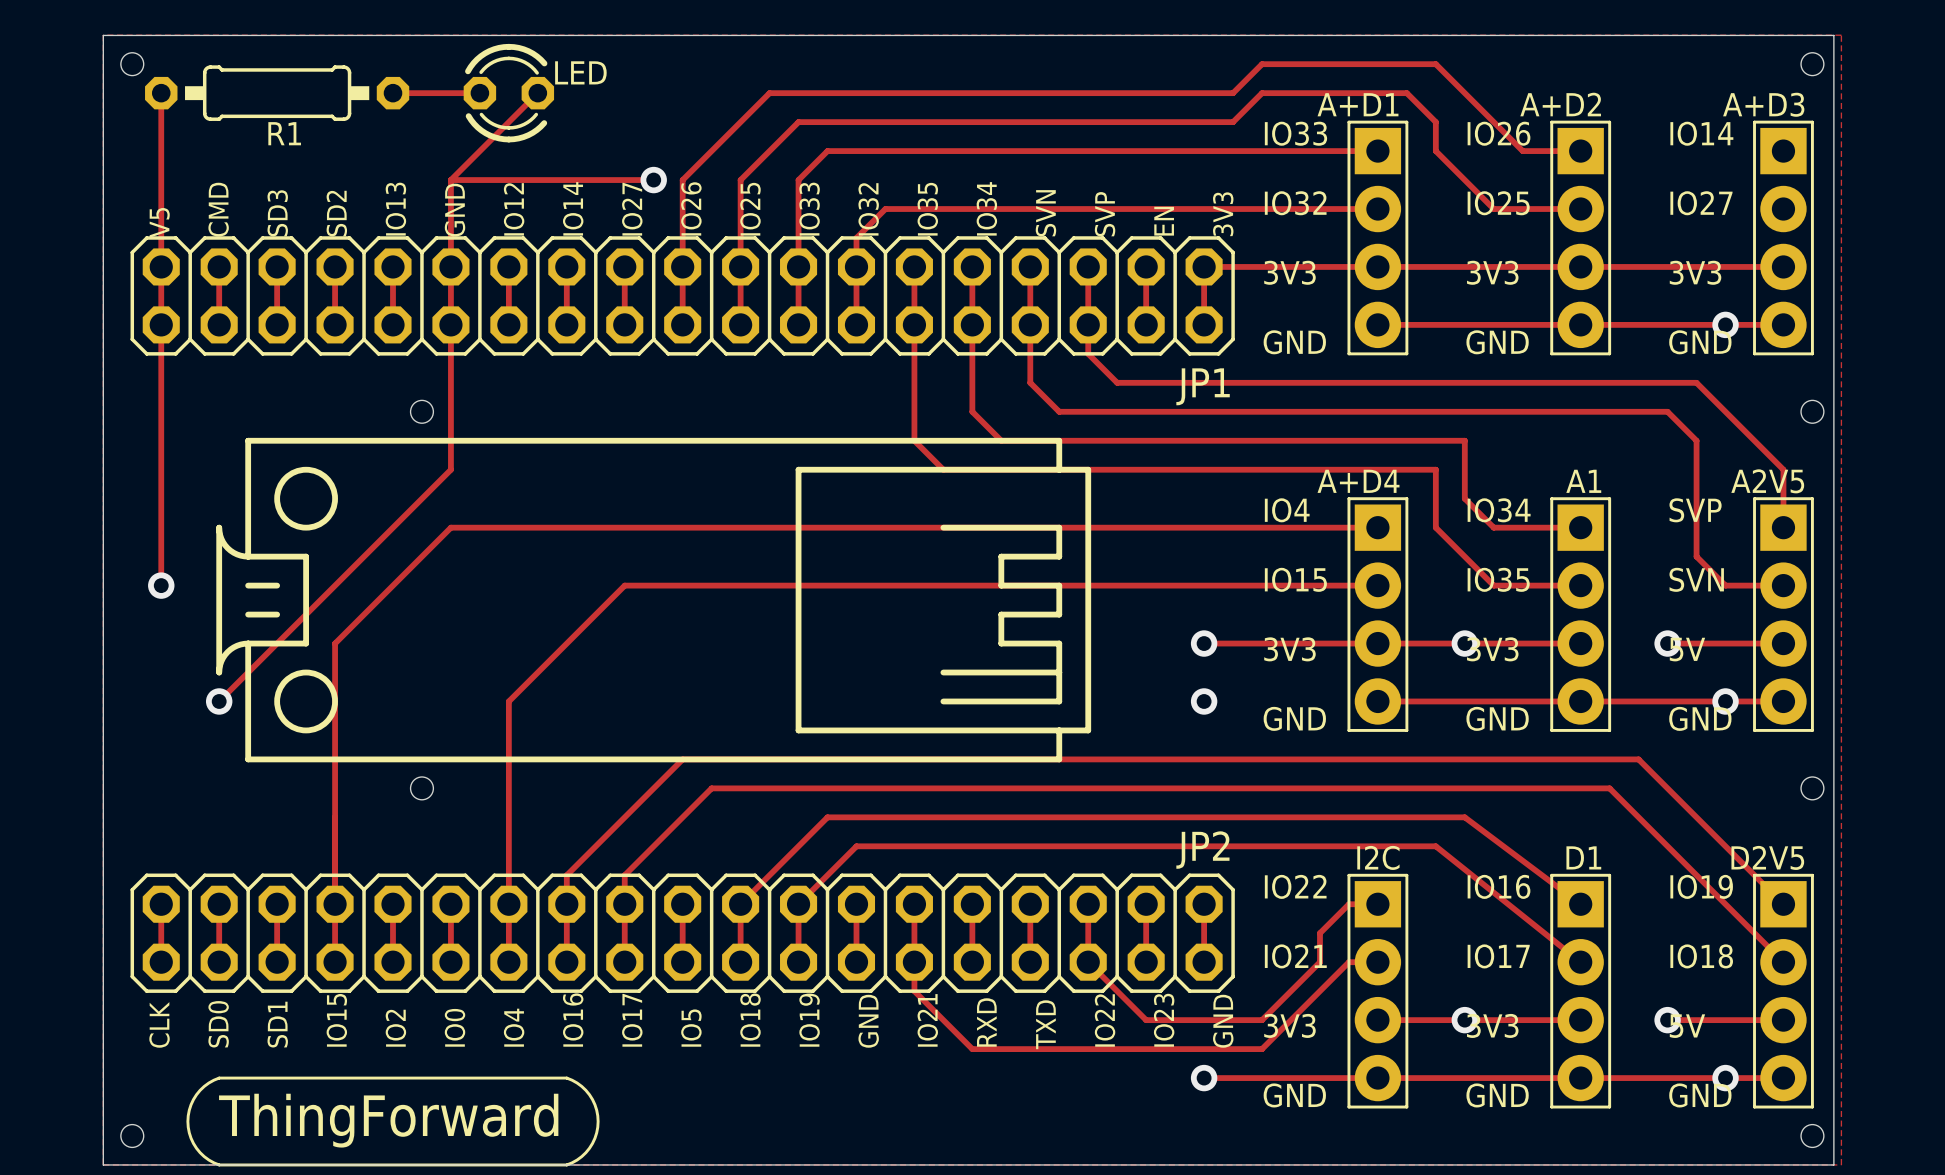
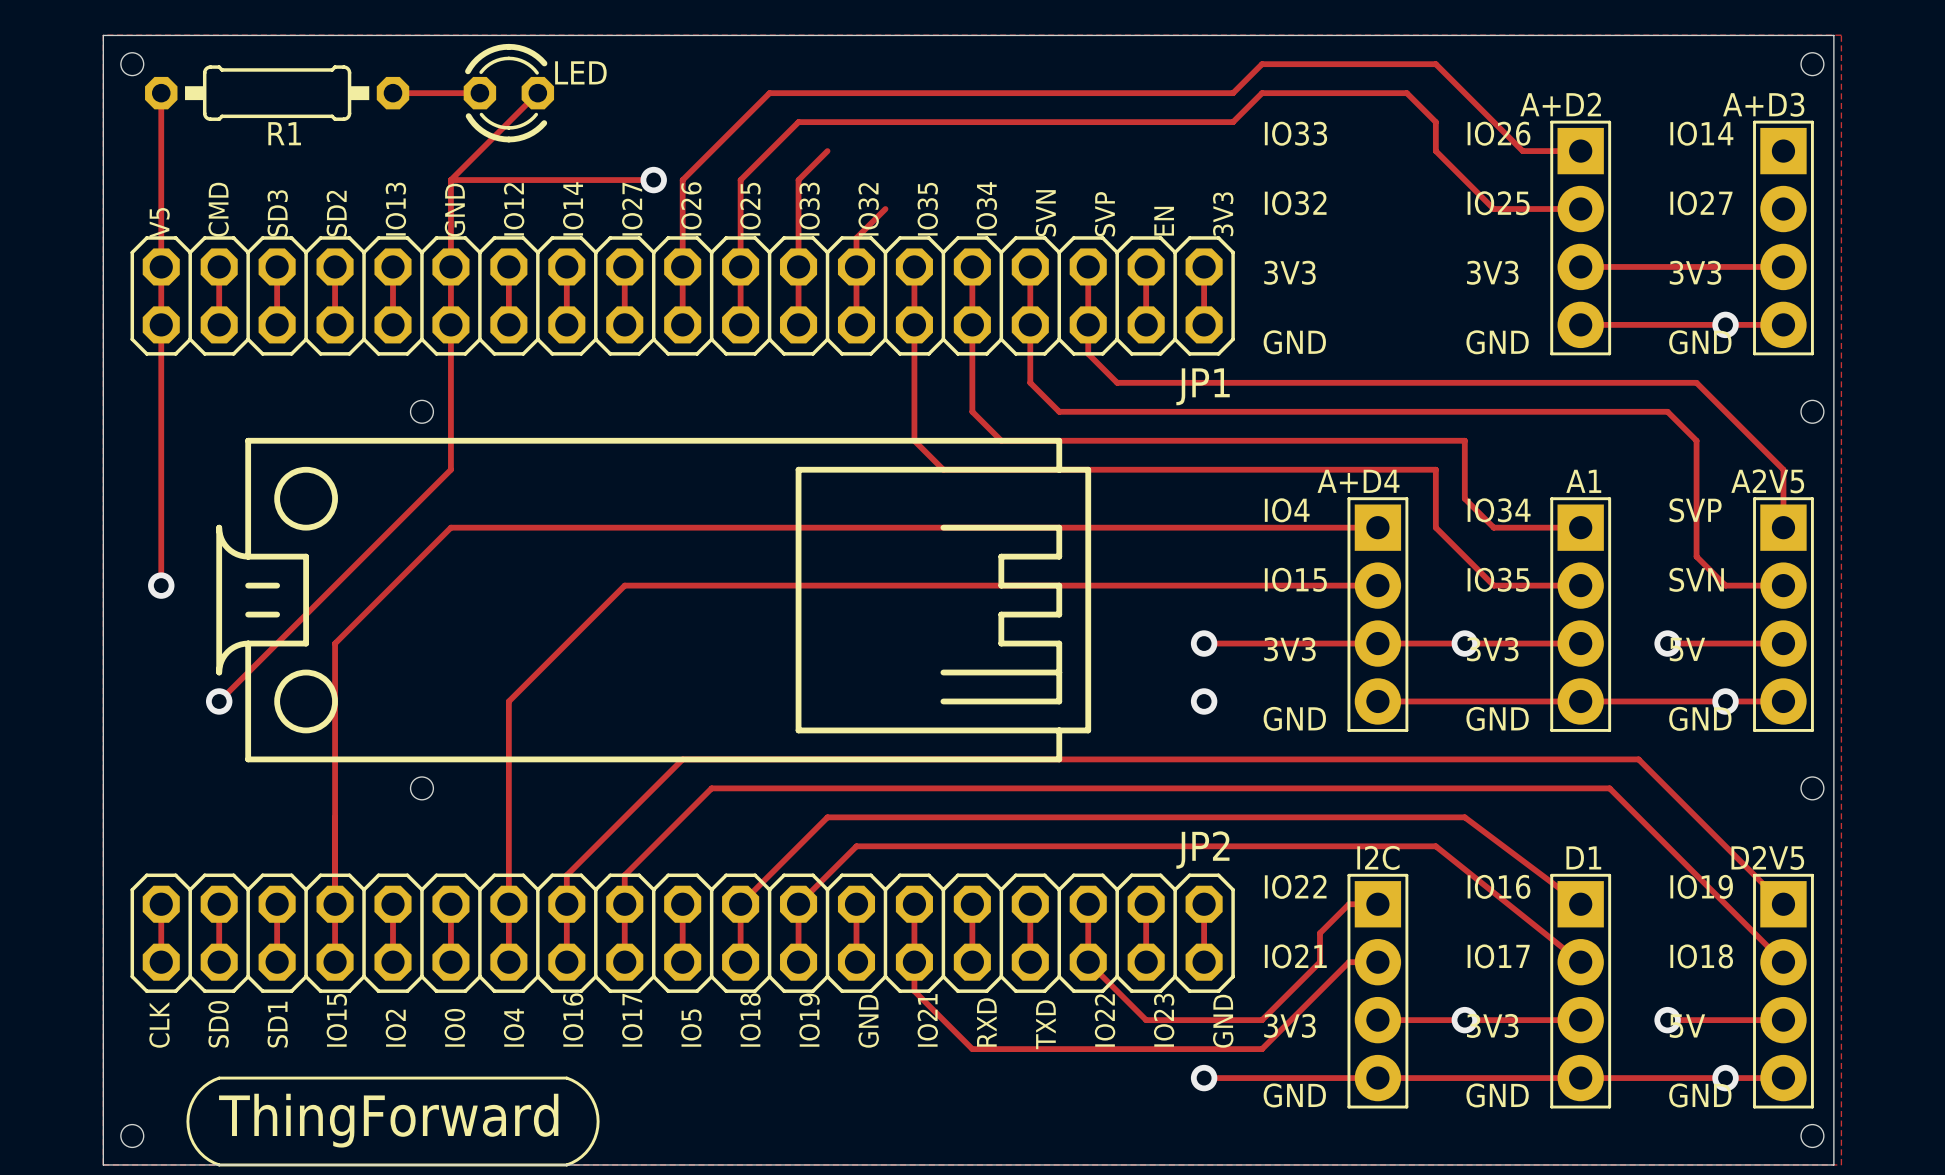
track: (827, 151) (1377, 151) -> none
track: (885, 209) (1377, 209) -> none
A+D1: (1377, 237) -> none
track: (1204, 266) (1580, 266) -> none
track: (1377, 324) (1580, 324) -> none

